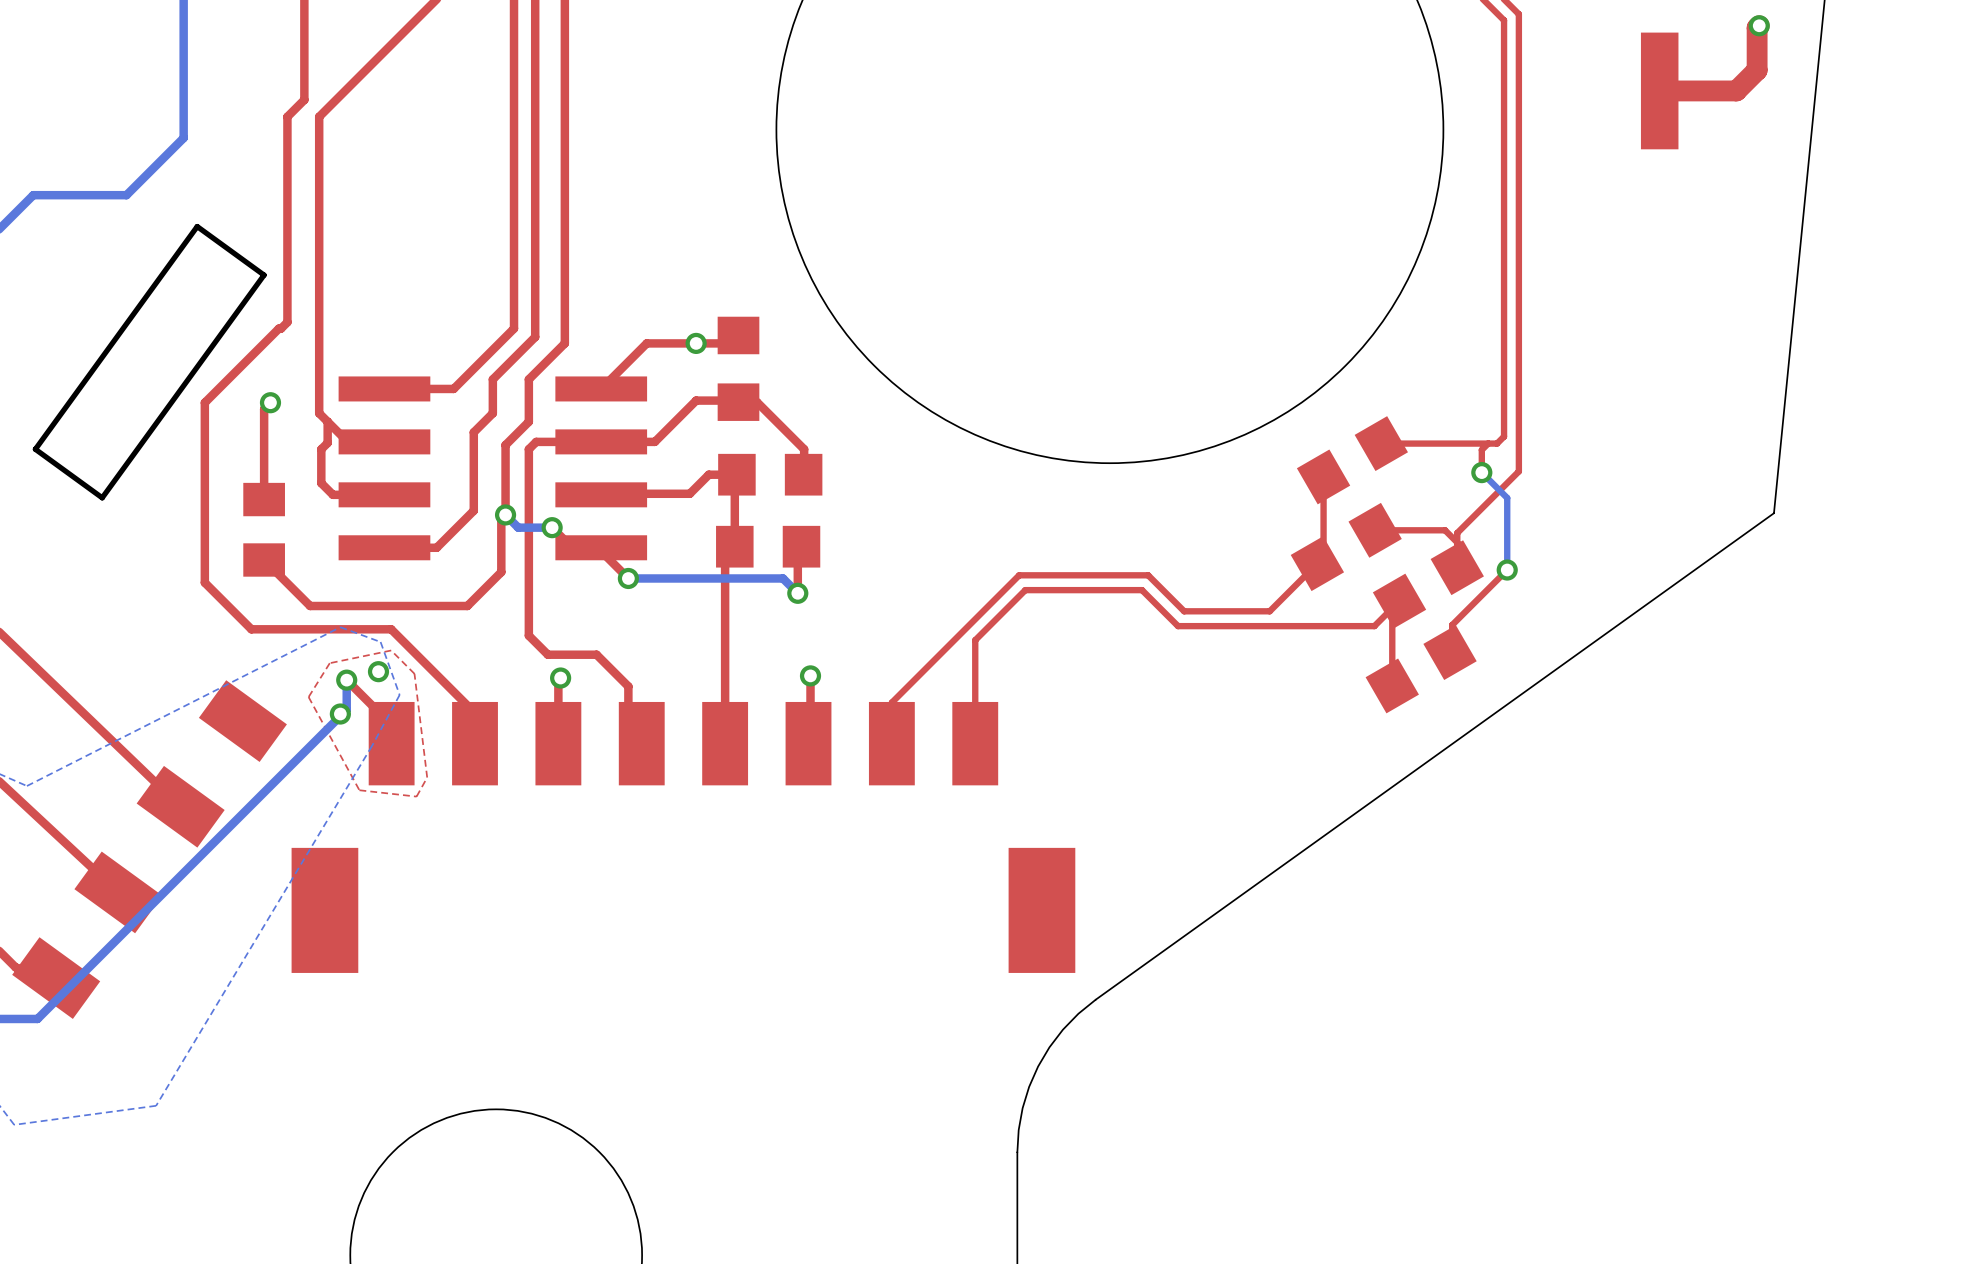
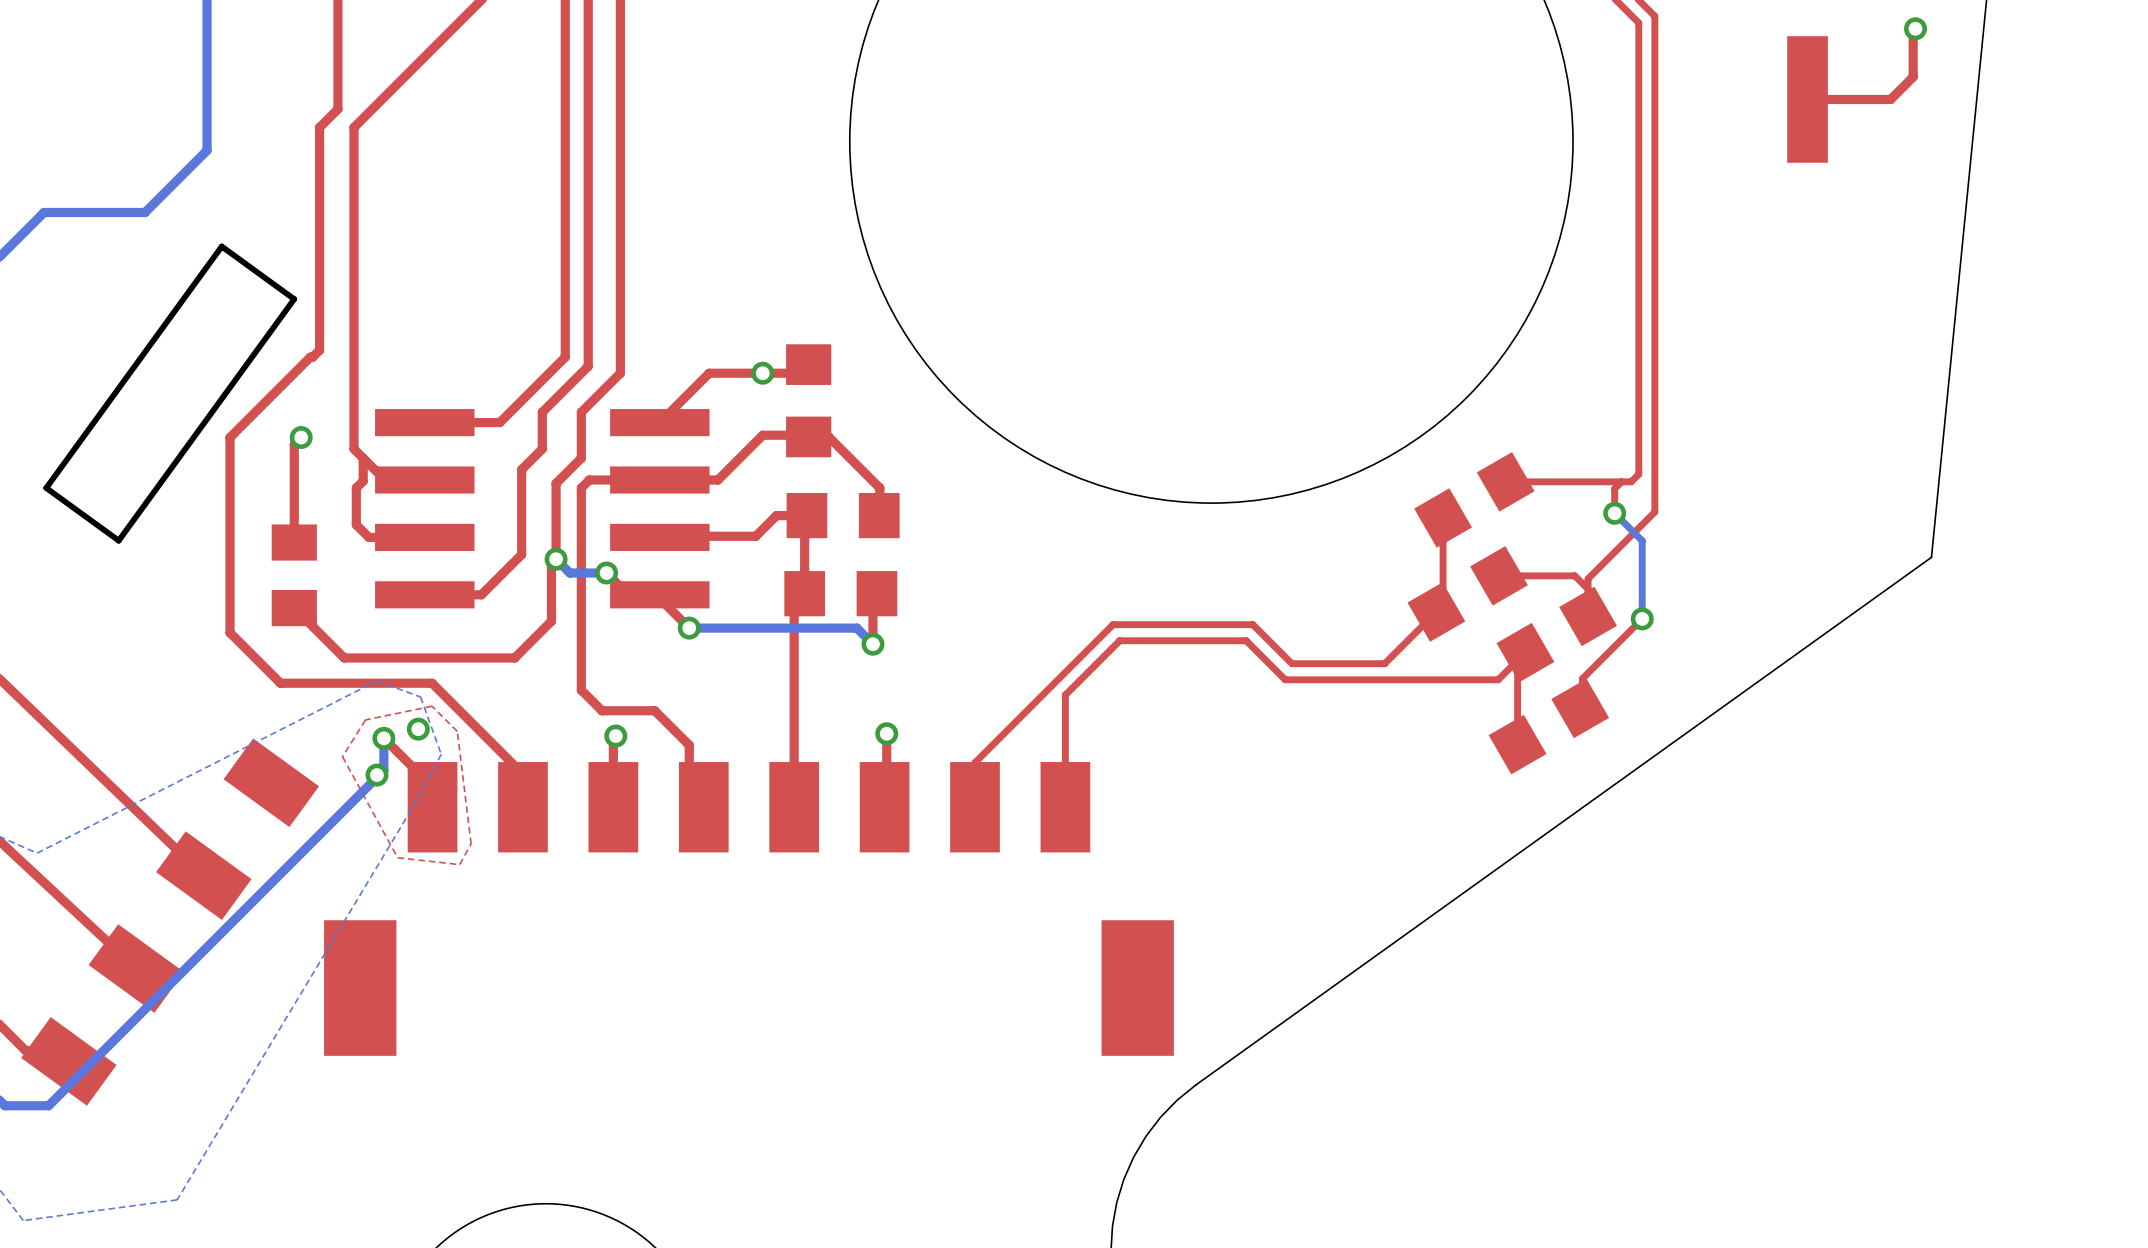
top track width: thick (1759, 25) (1757, 27) (1757, 70) (1736, 90) (1659, 90) -> thin (1915, 28) (1913, 31) (1913, 77) (1890, 99) (1807, 99)

